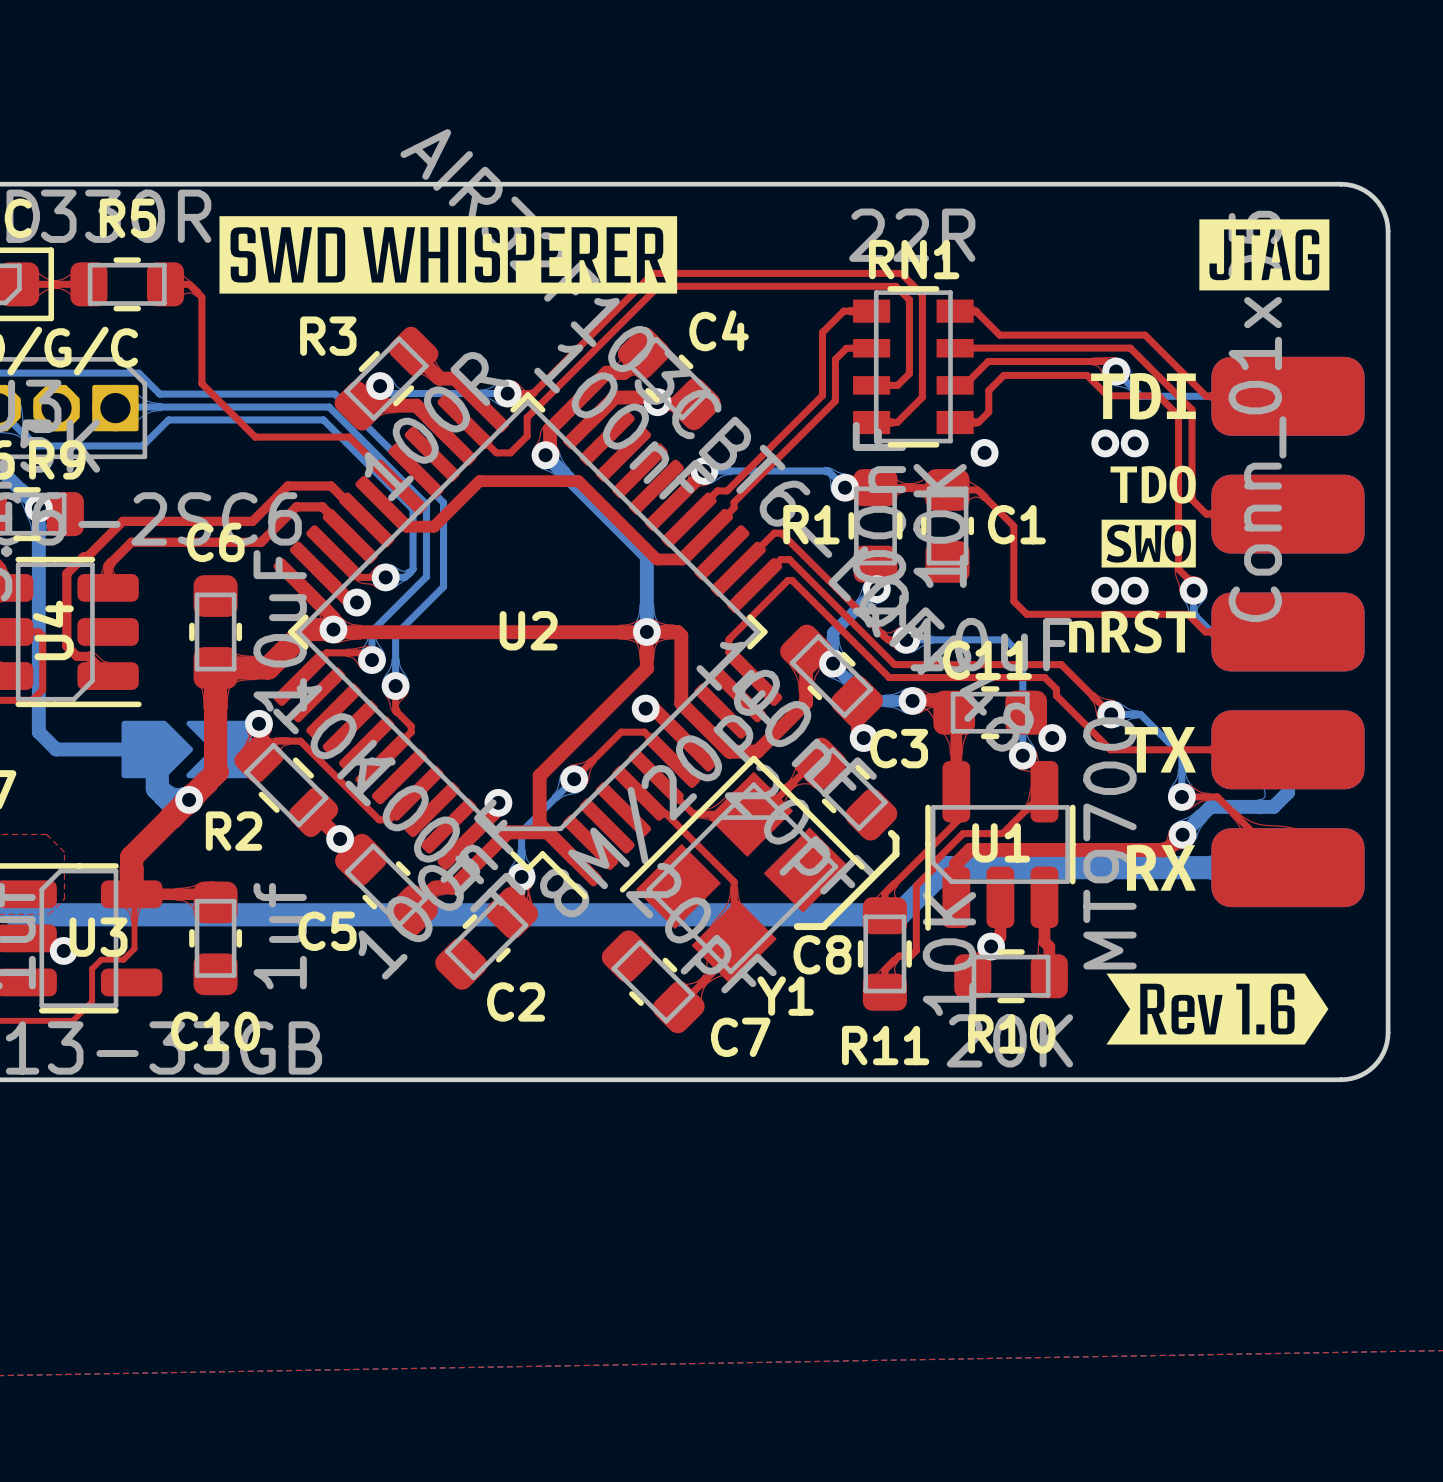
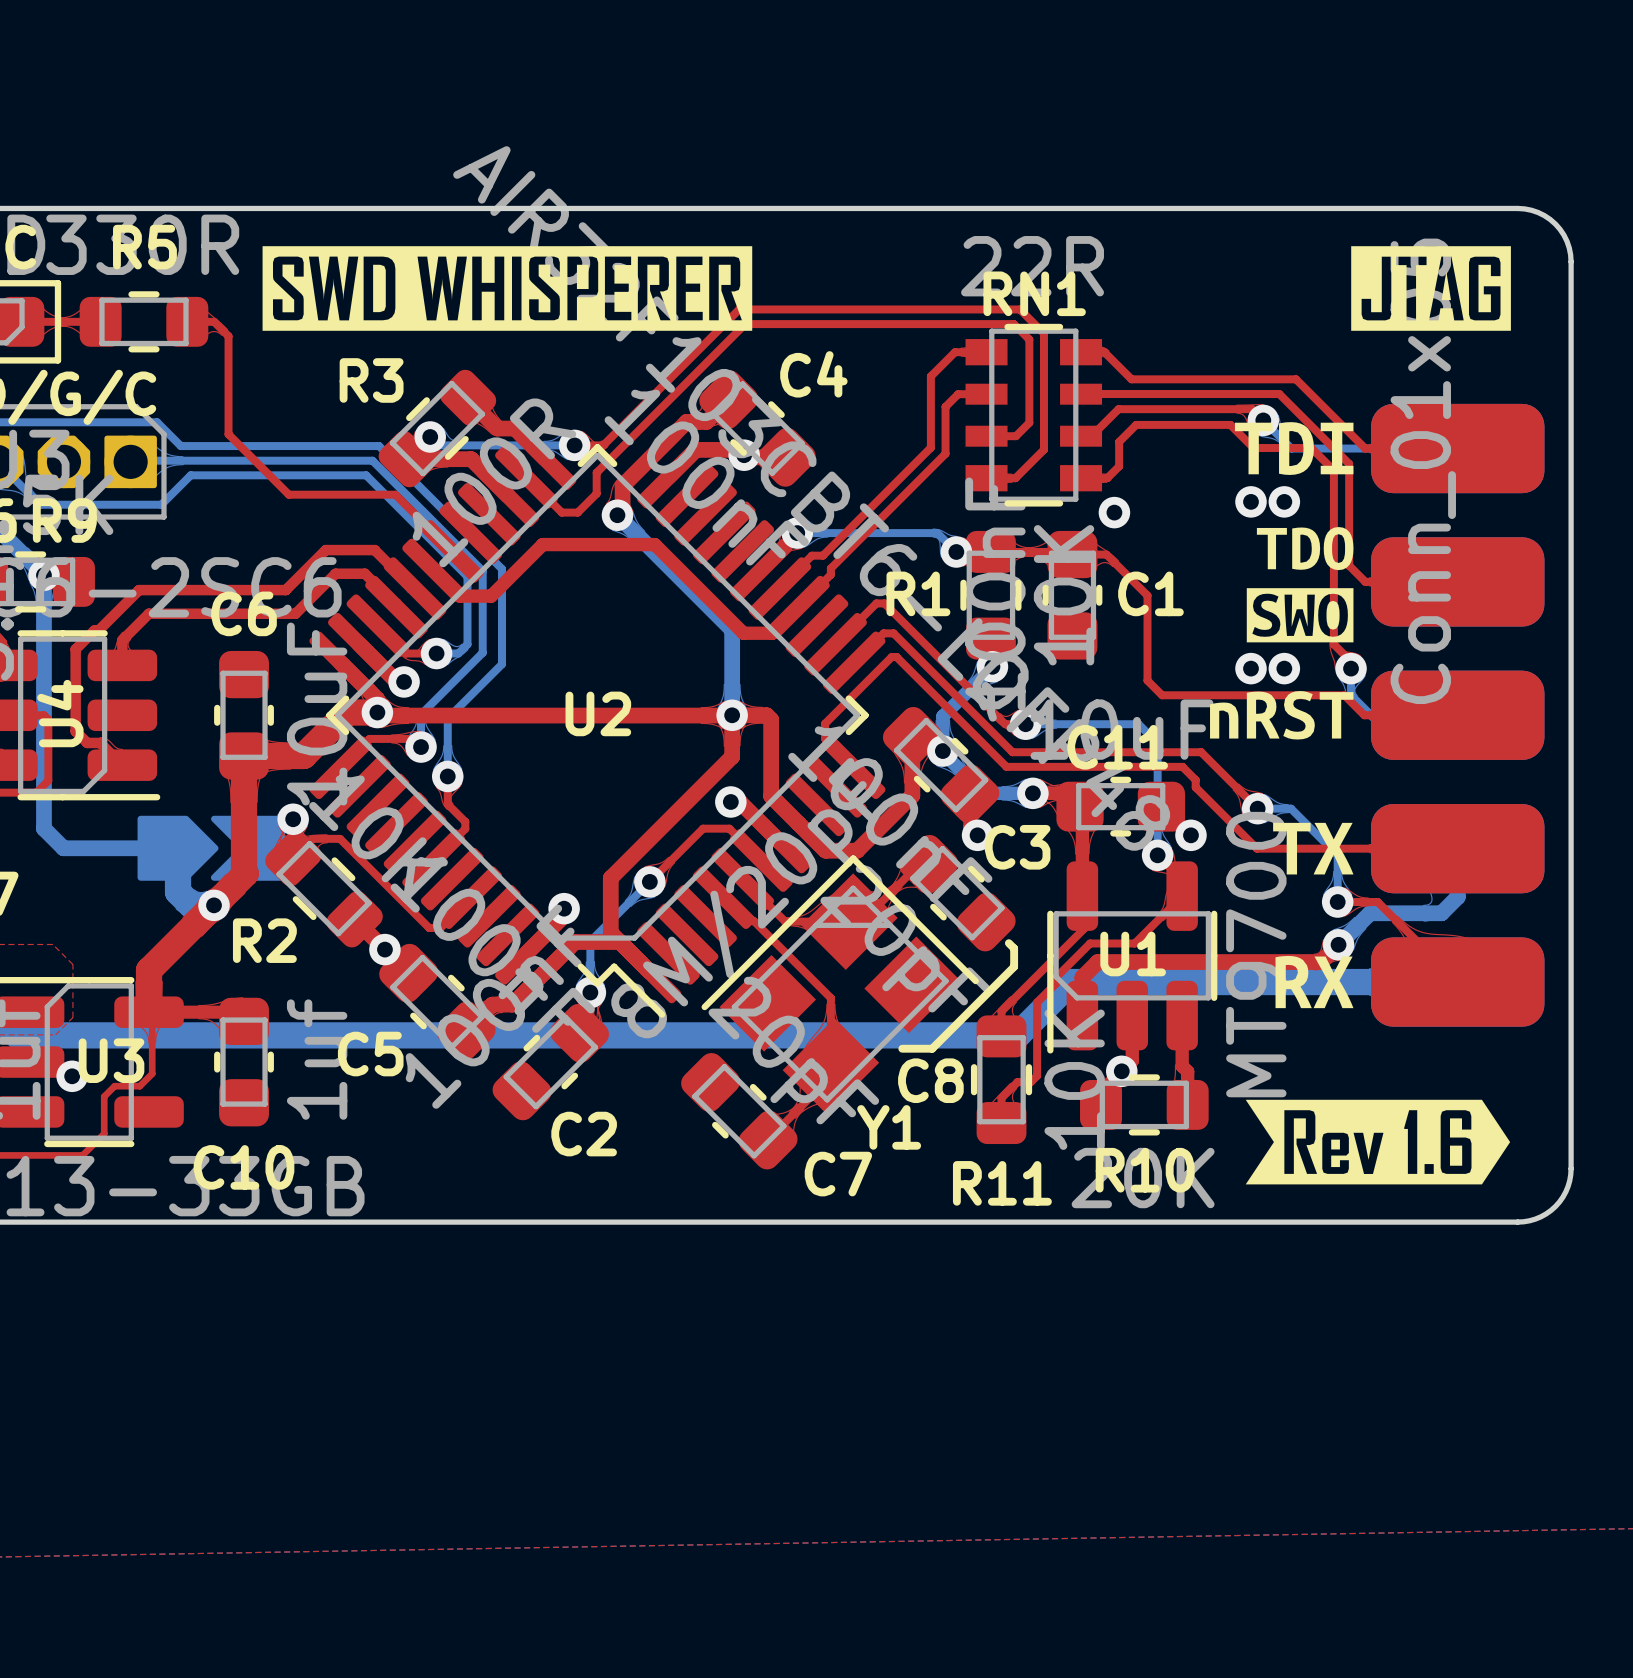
drawing shape: [219, 216, 678, 294] -> [262, 246, 753, 331]
drawing shape: [1199, 219, 1330, 291] -> [1351, 246, 1511, 331]
drawing shape: [1106, 973, 1329, 1045] -> [1245, 1099, 1511, 1185]

